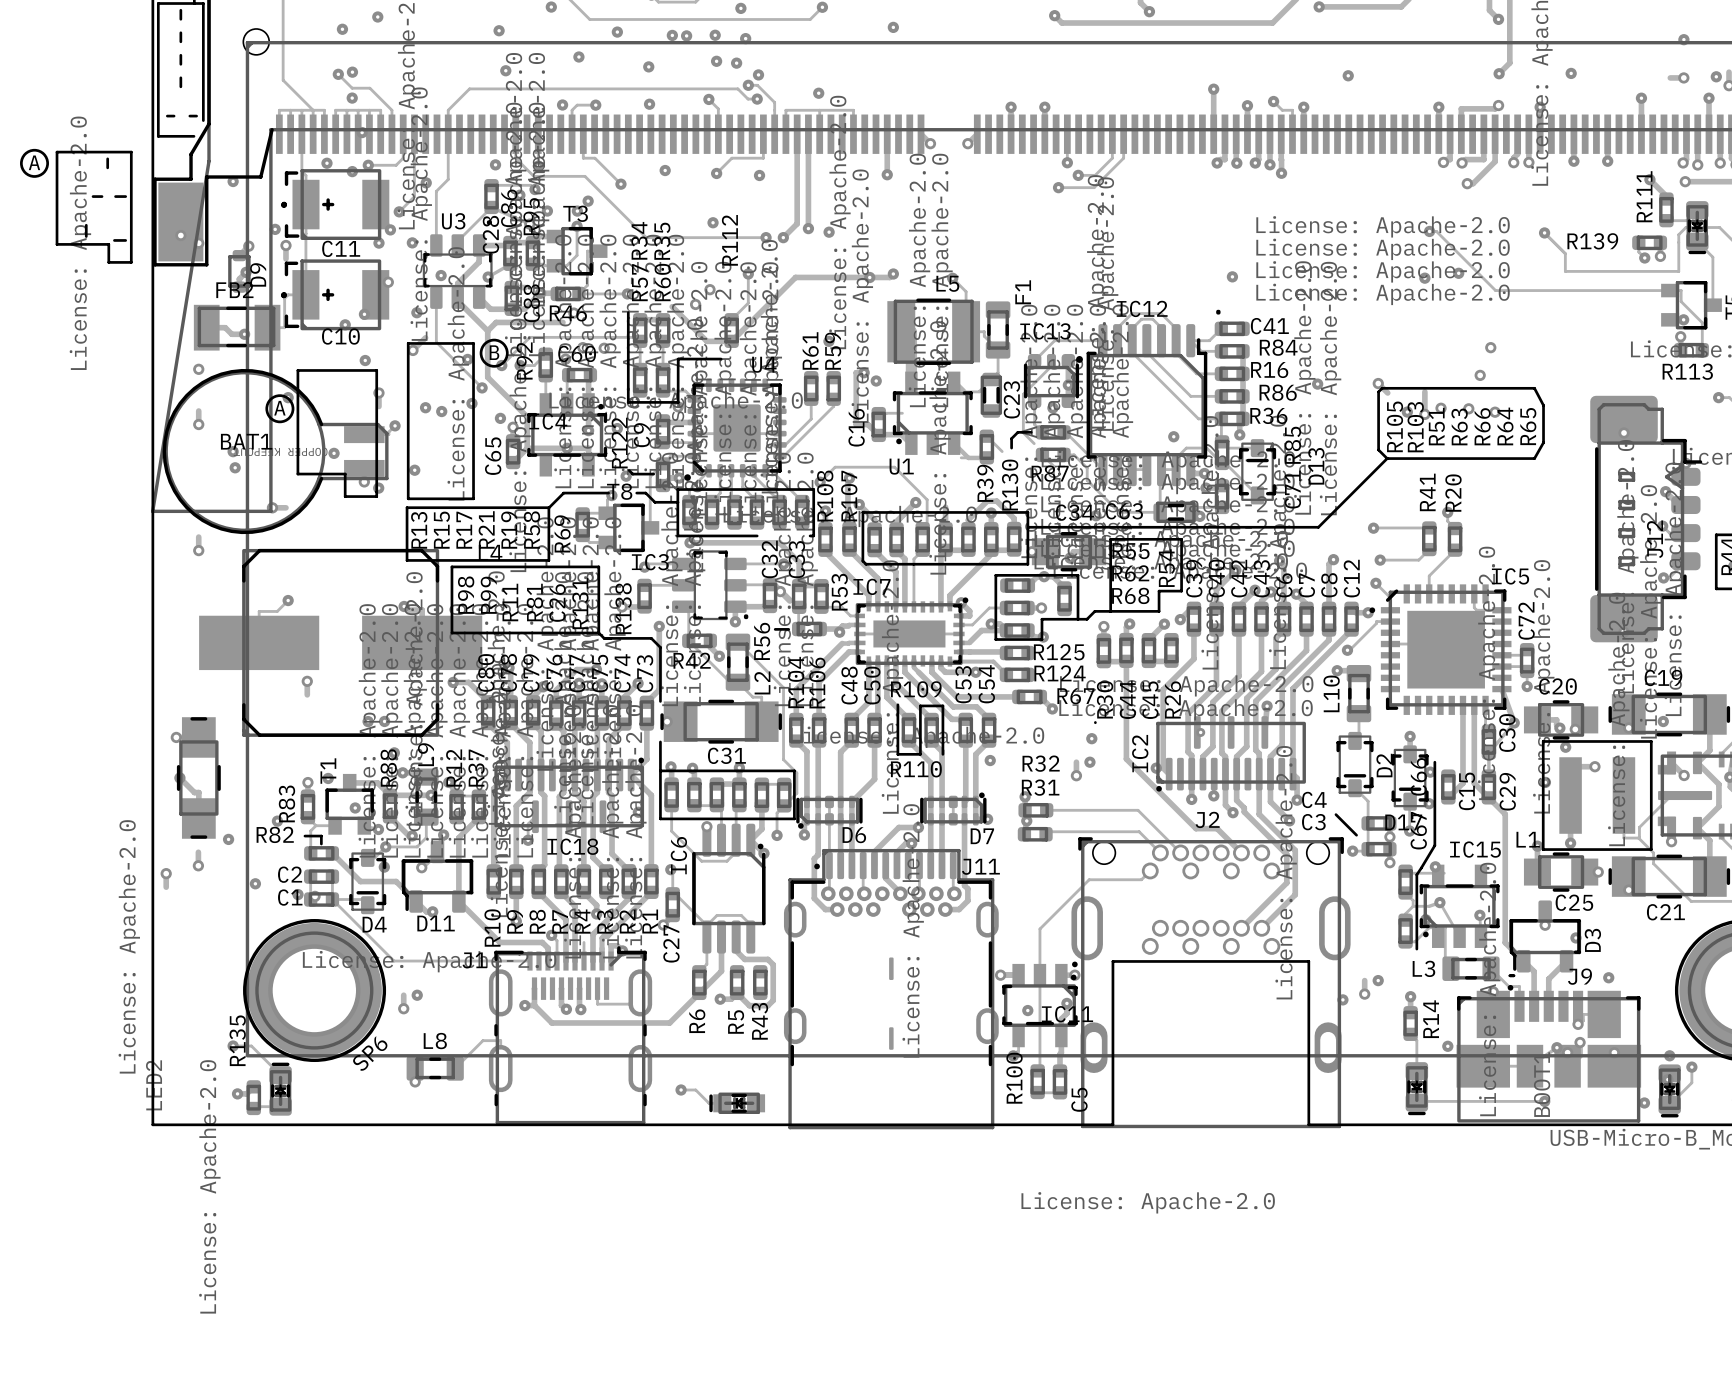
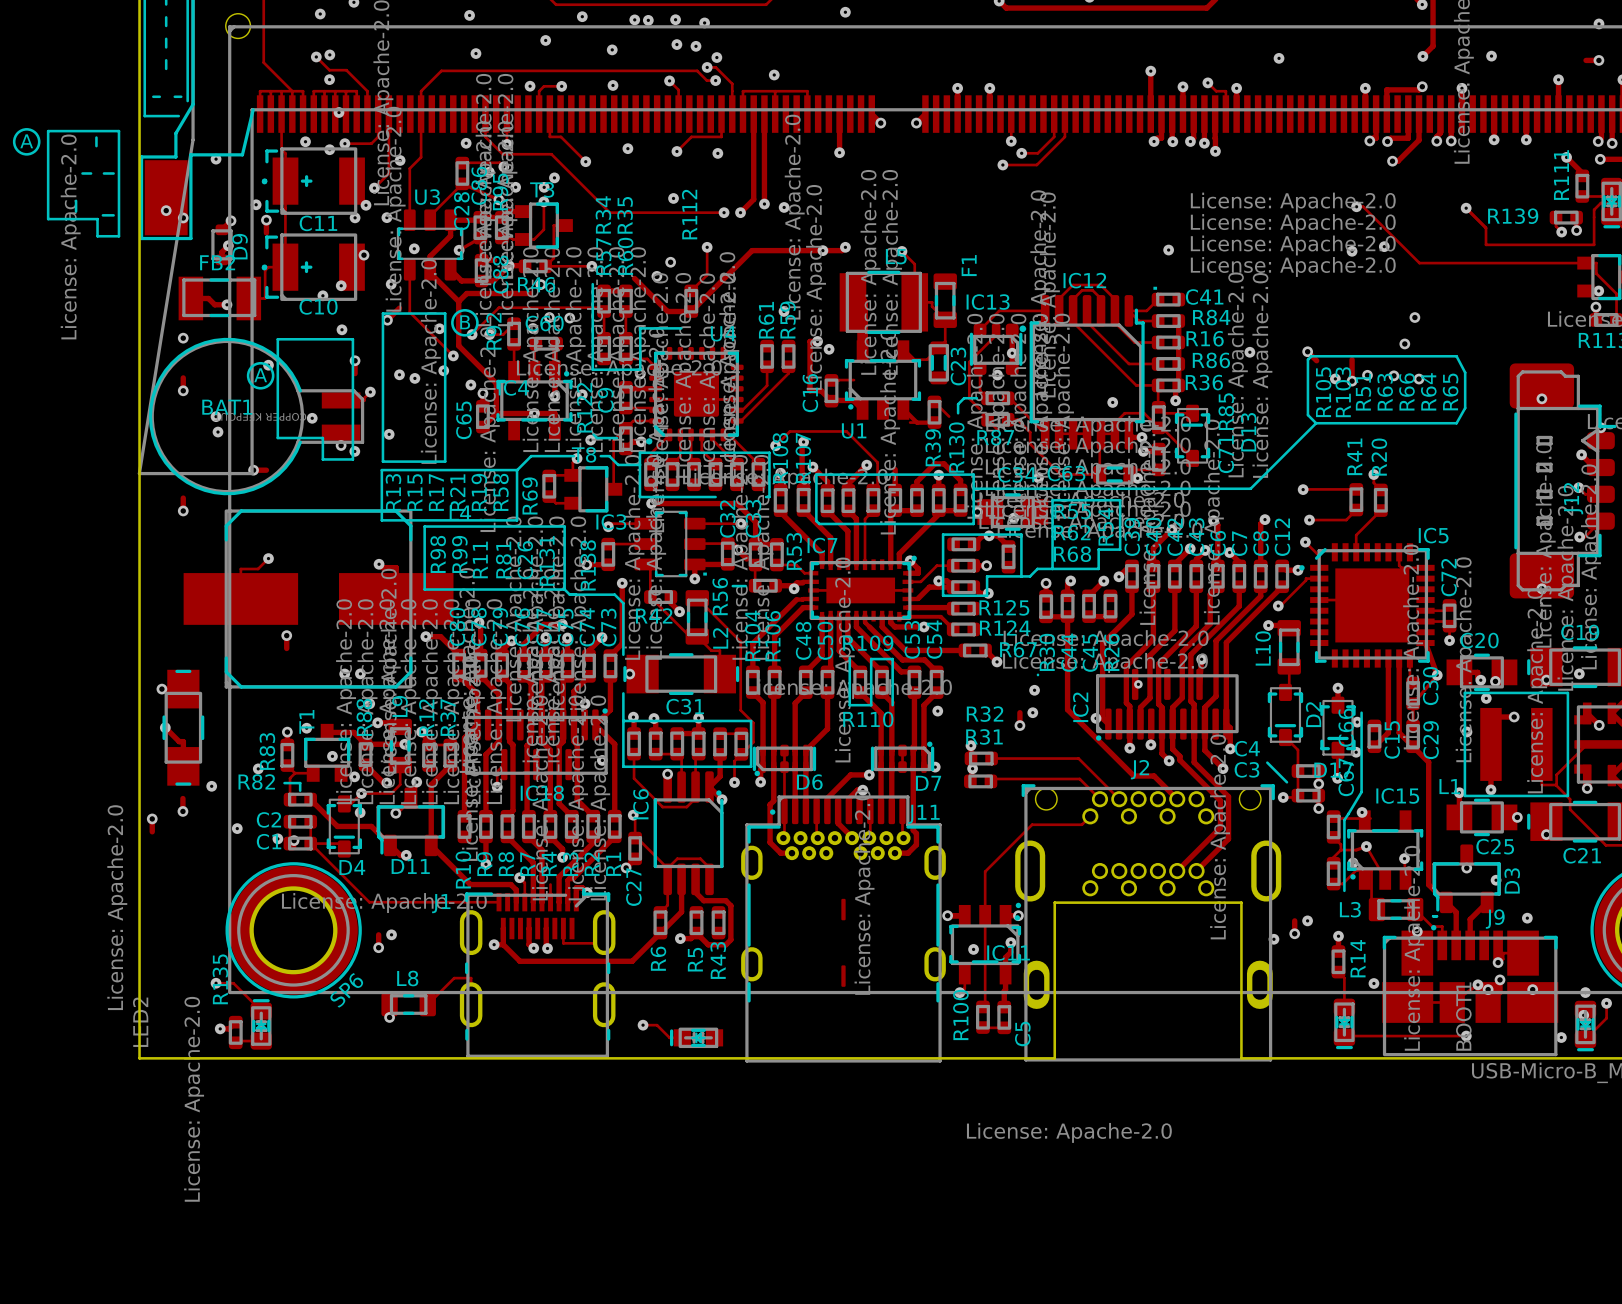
via: none -> (585, 703)

